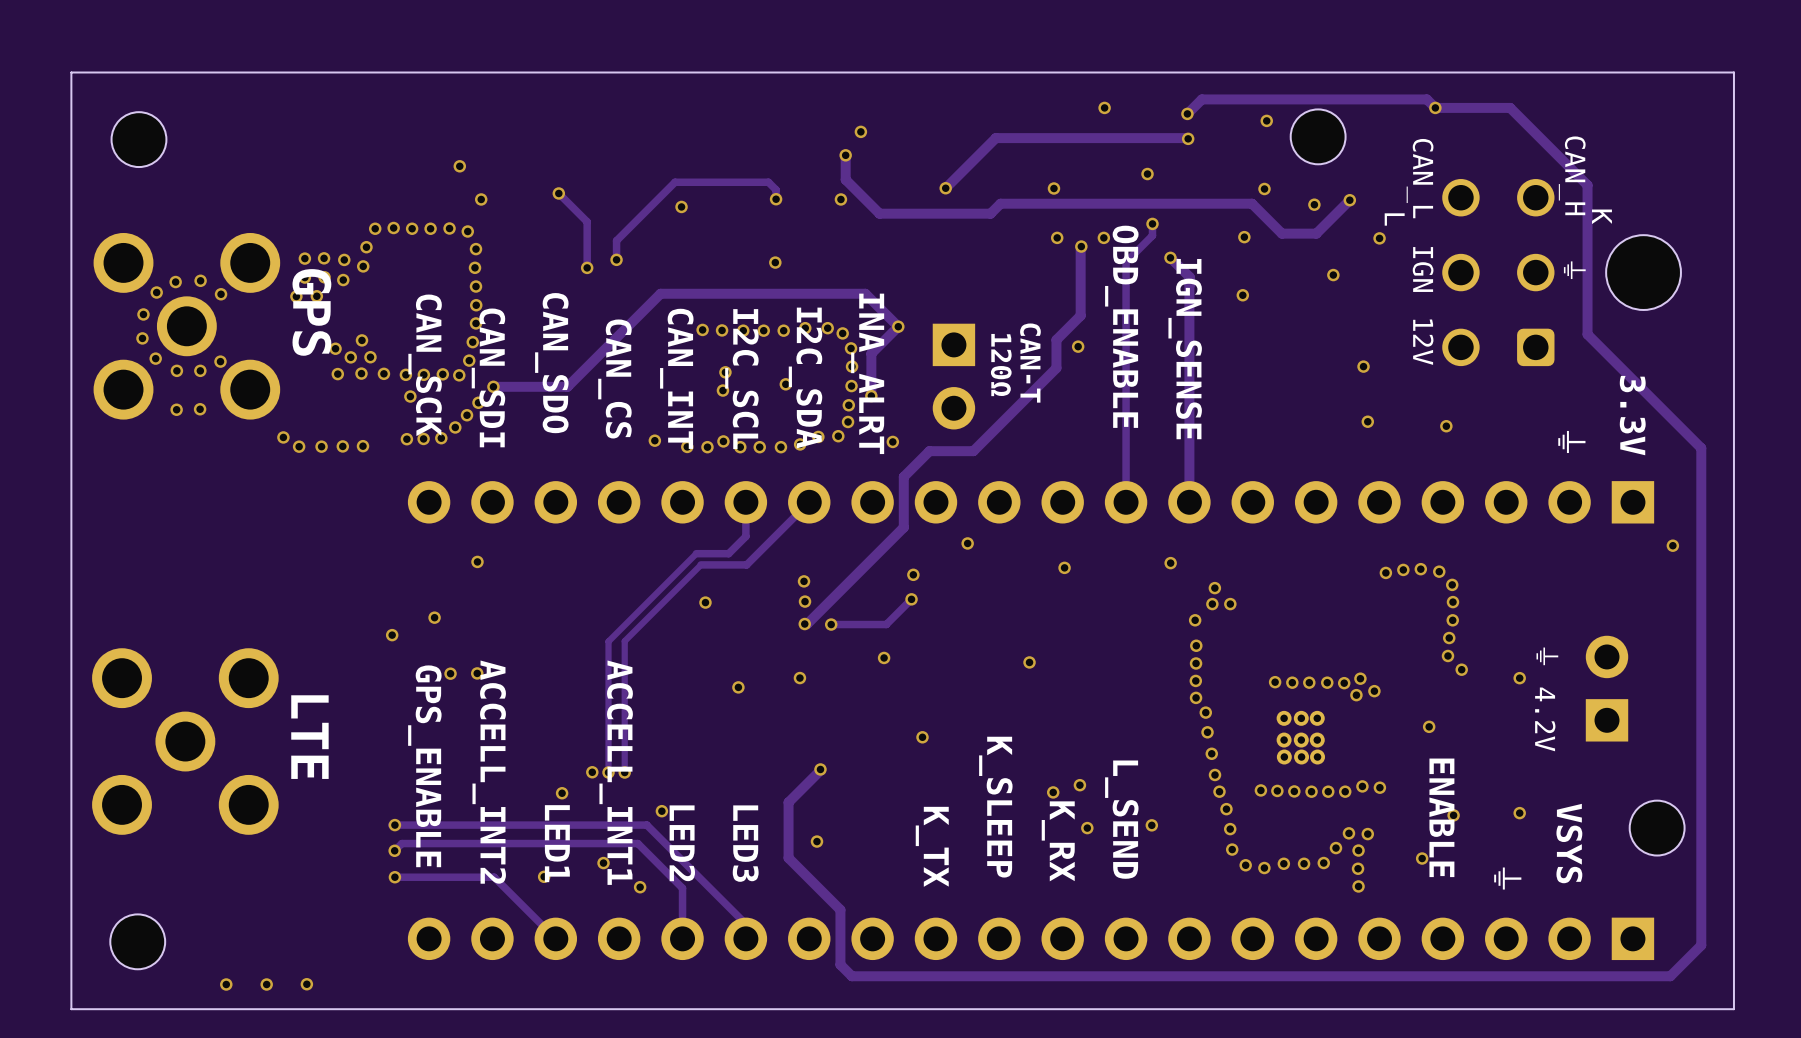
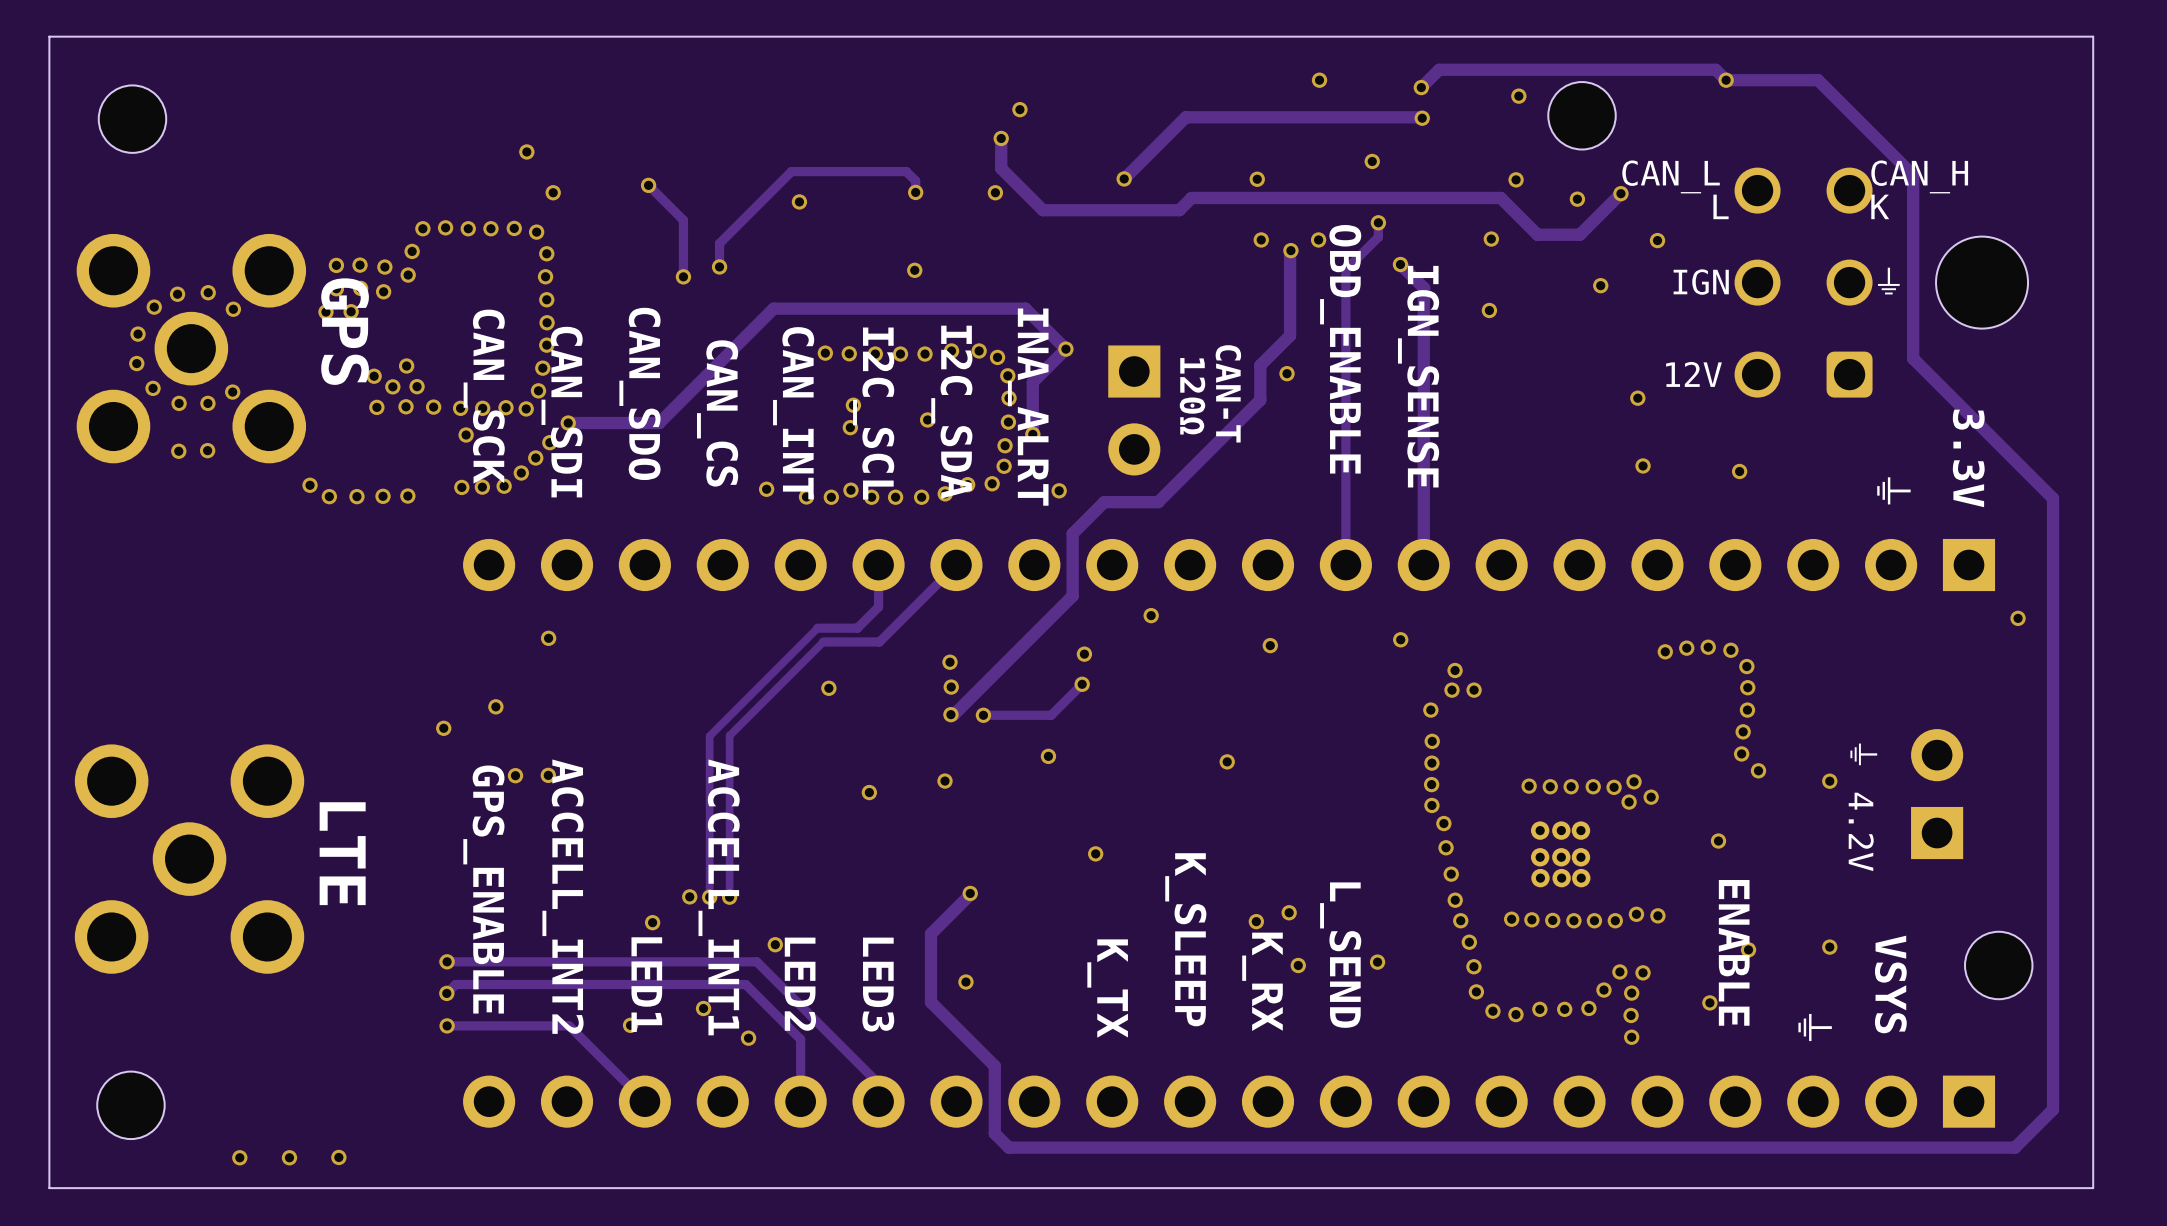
text rotation: 0° (1572, 175) -> 90° counterclockwise (1919, 176)
text rotation: 0° (1420, 178) -> 90° counterclockwise (1671, 176)
text rotation: 0° (1601, 216) -> 90° counterclockwise (1880, 206)
text rotation: 0° (1394, 219) -> 90° counterclockwise (1721, 206)
text position: L (1394, 219) -> L (1721, 206)
text rotation: 0° (1423, 269) -> 90° counterclockwise (1701, 282)
text rotation: 0° (1574, 270) -> 90° counterclockwise (1888, 281)
text rotation: 0° (1423, 342) -> 90° counterclockwise (1693, 374)

